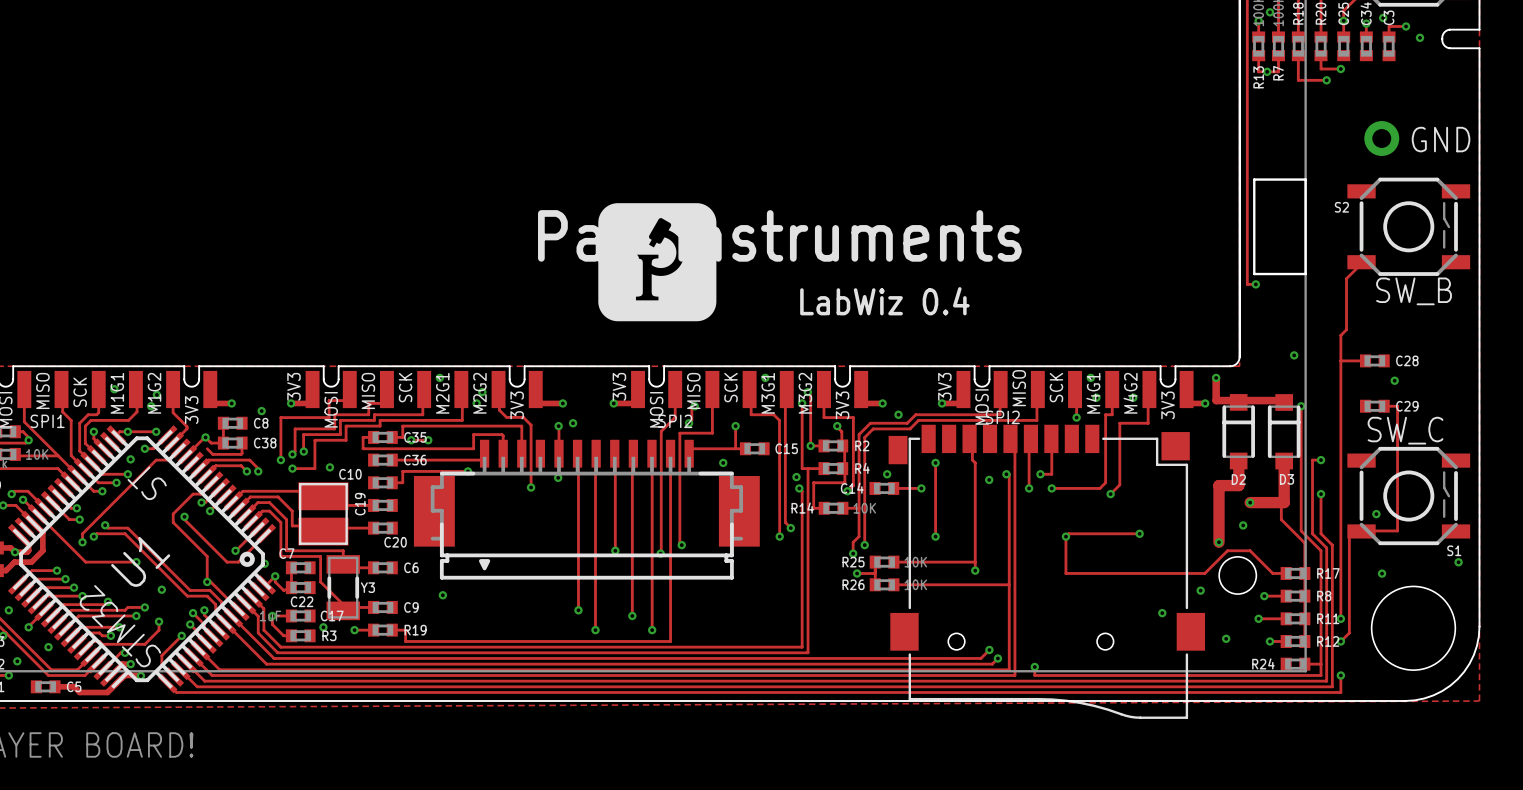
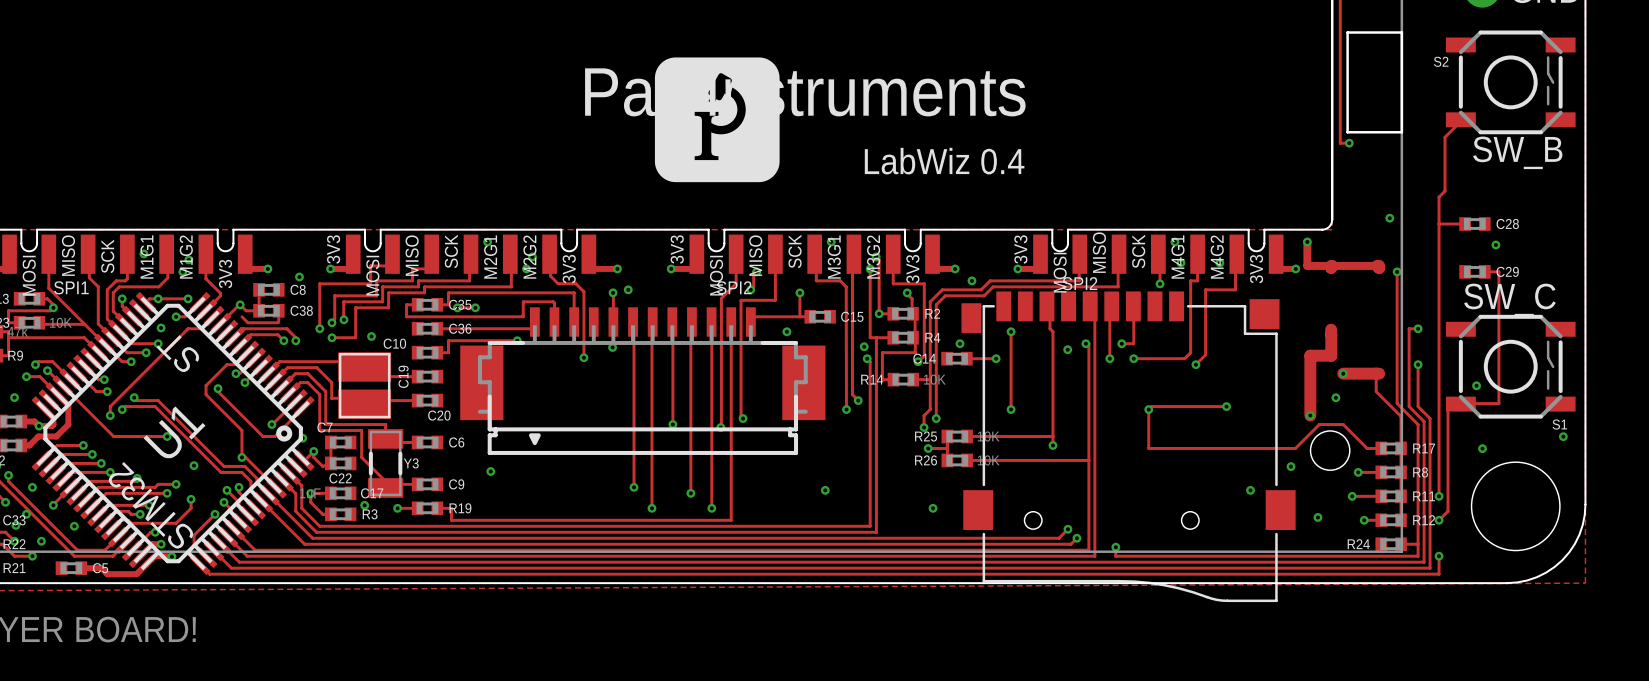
D2: (1238, 431) -> none
D3: (1284, 431) -> none
track: (1284, 461) (1284, 502) -> none
via: none -> (825, 490)
via: none -> (933, 508)

